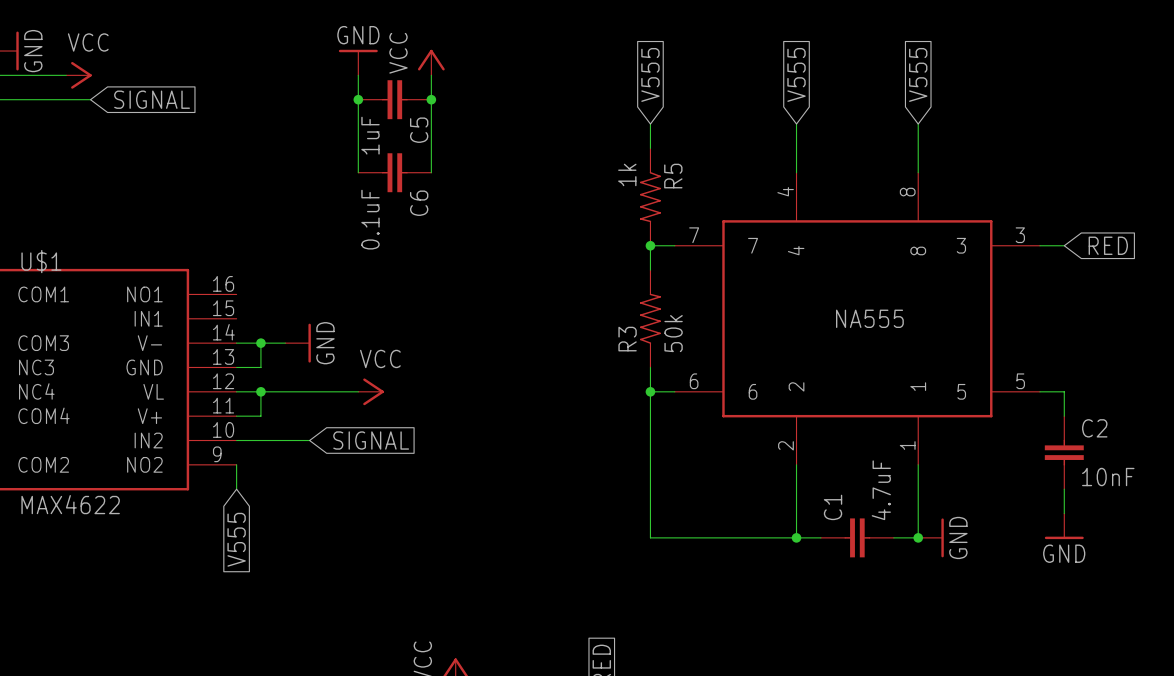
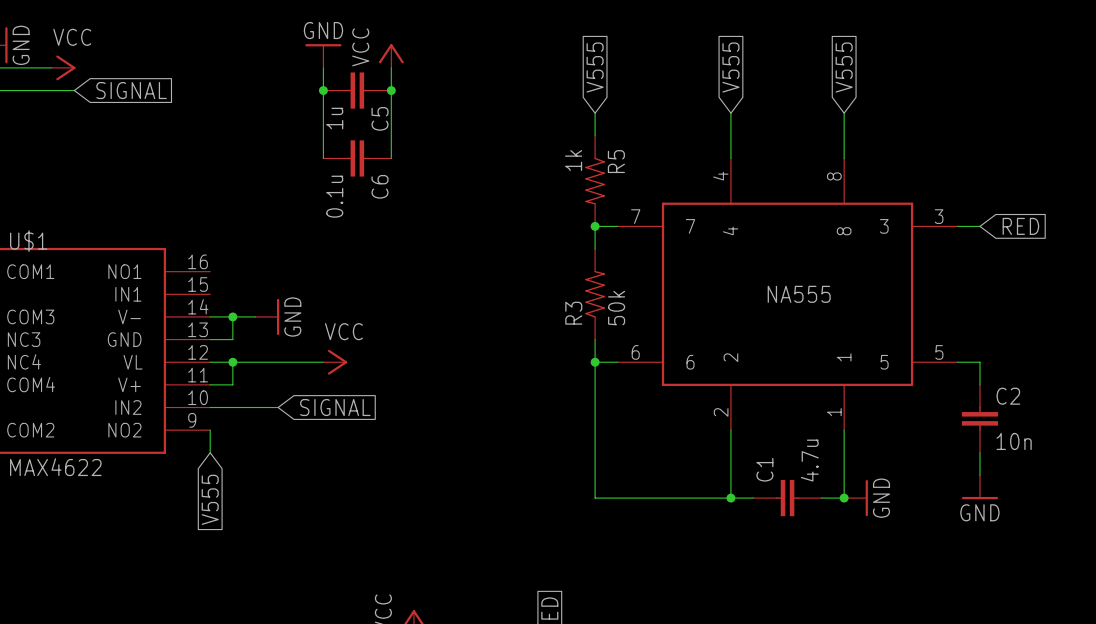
C5 value: 1uF (370, 135) -> 1u (334, 118)
C6 value: 0.1uF (370, 219) -> 0.1u (334, 196)
C2 value: 10nF (1108, 477) -> 10n (1014, 441)
C1 value: 4.7uF (881, 490) -> 4.7u (809, 460)

